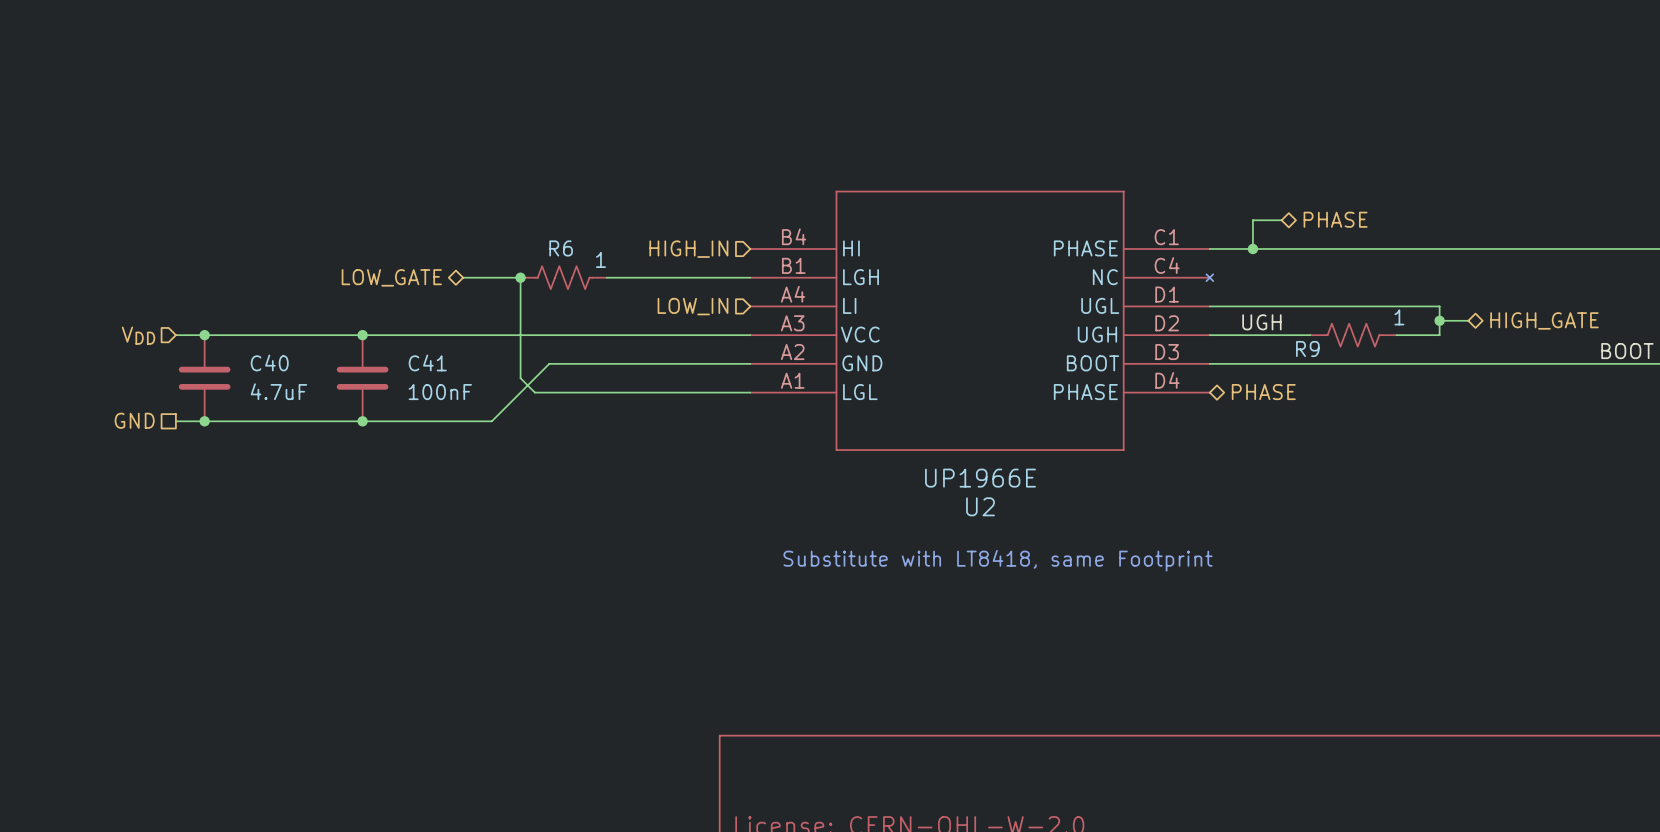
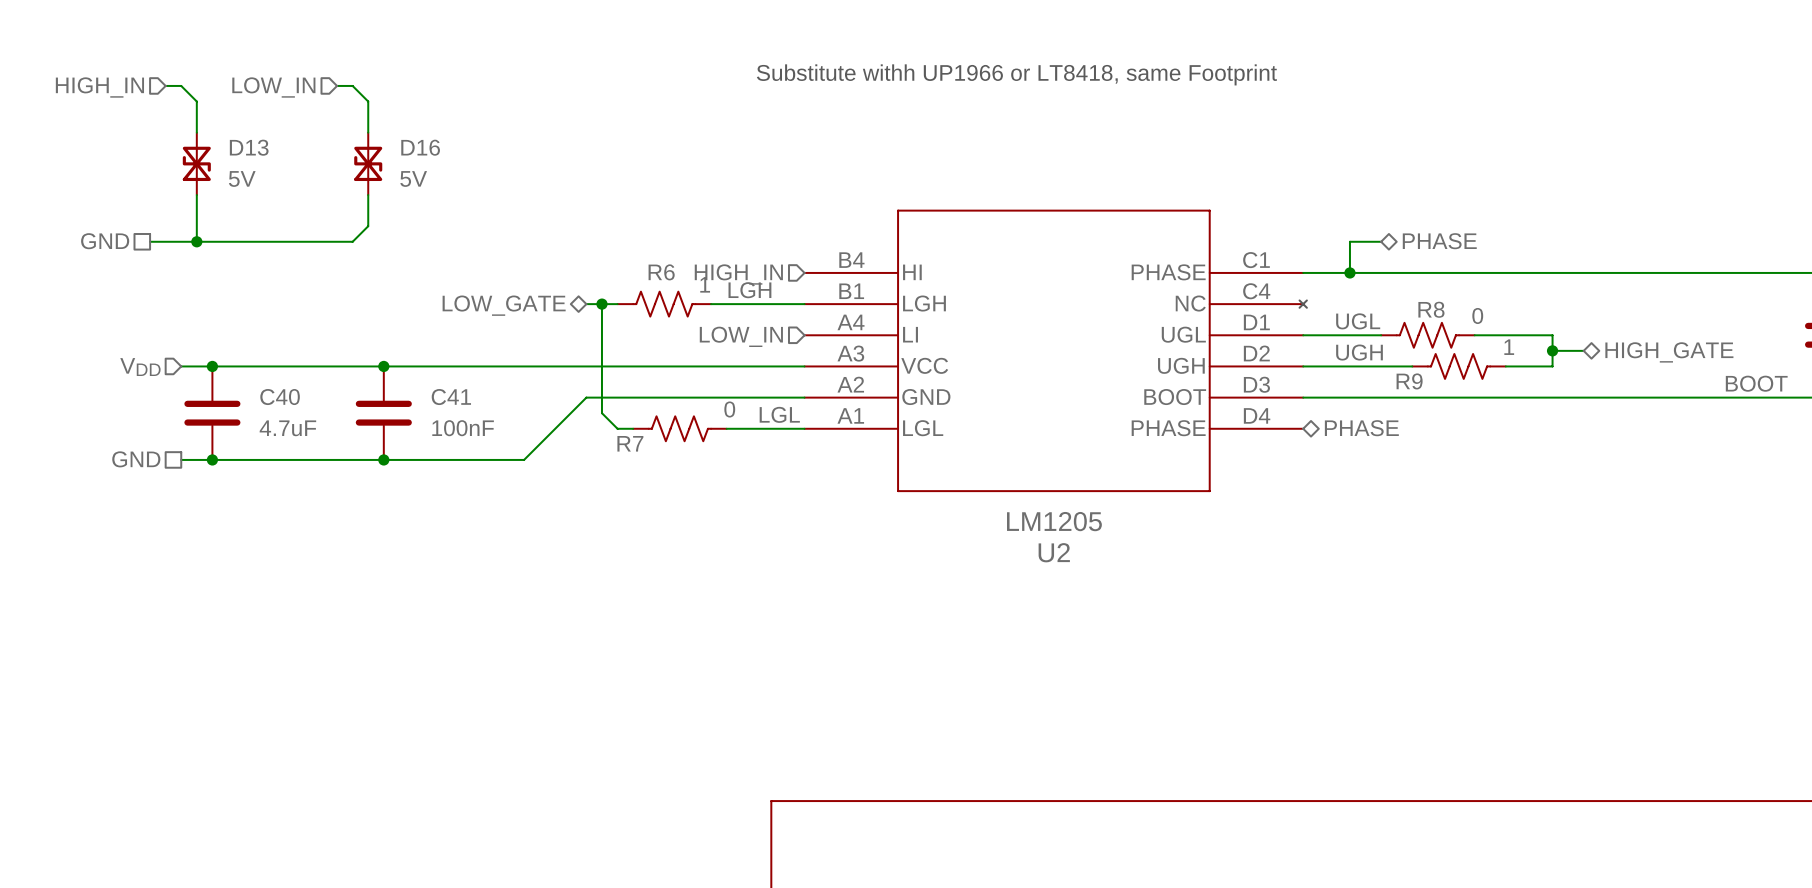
text: none -> Substitute withh UP1966 or LT8418, same Footprint (1016, 74)
hierarchical label: none -> HIGH_IN (99, 87)
wire: none -> (165, 85) (181, 85) (196, 101) (196, 132)
hierarchical label: none -> LOW_IN (273, 87)
wire: none -> (337, 85) (352, 85) (368, 101) (368, 132)
D13: none -> 5V (196, 163)
D16: none -> 5V (368, 163)
wire: none -> (196, 195) (196, 241)
wire: none -> (368, 195) (368, 226) (352, 241) (150, 241)
hierarchical label: none -> GND (105, 241)
junction: none -> (196, 241)
label: none -> LGH (749, 290)
hierarchical label position: LOW_GATE (391, 277) -> LOW_GATE (504, 305)
wire: (463, 277) (520, 277) (520, 378) (534, 392) (578, 392) -> (601, 304) (601, 413) (617, 428)
junction position: (520, 277) -> (601, 304)
wire: none -> (586, 304) (617, 304)
R6 position: (563, 277) -> (664, 304)
wire: (606, 277) (664, 277) -> none
label: none -> UGL (1358, 321)
R8: none -> 0 (1427, 335)
label: none -> LGL (779, 414)
R7: none -> 0 (679, 428)
U2 value: UP1966E (980, 478) -> LM1205 (1054, 521)
text: Substitute with LT8418, same Footprint (998, 560) -> none

